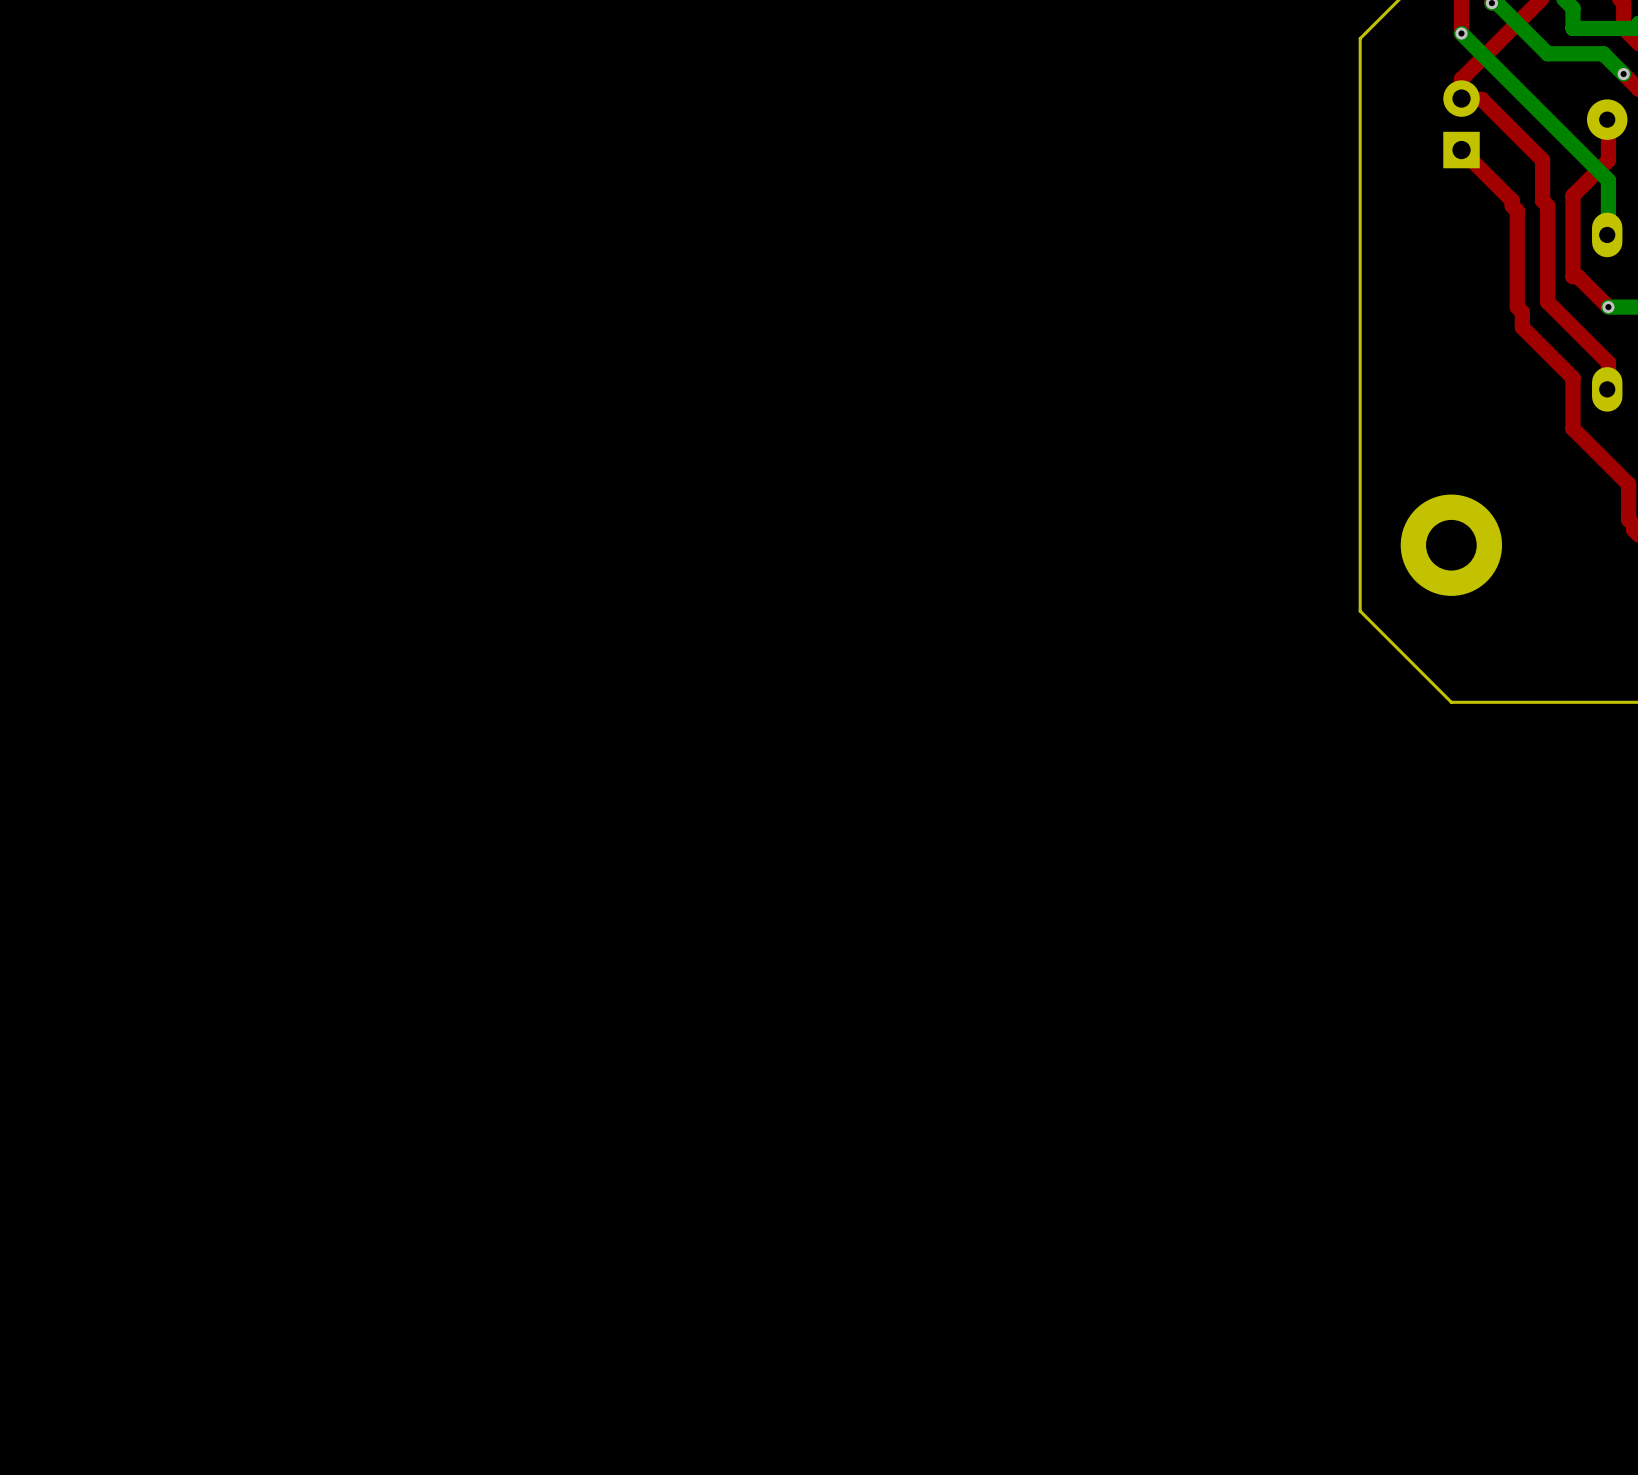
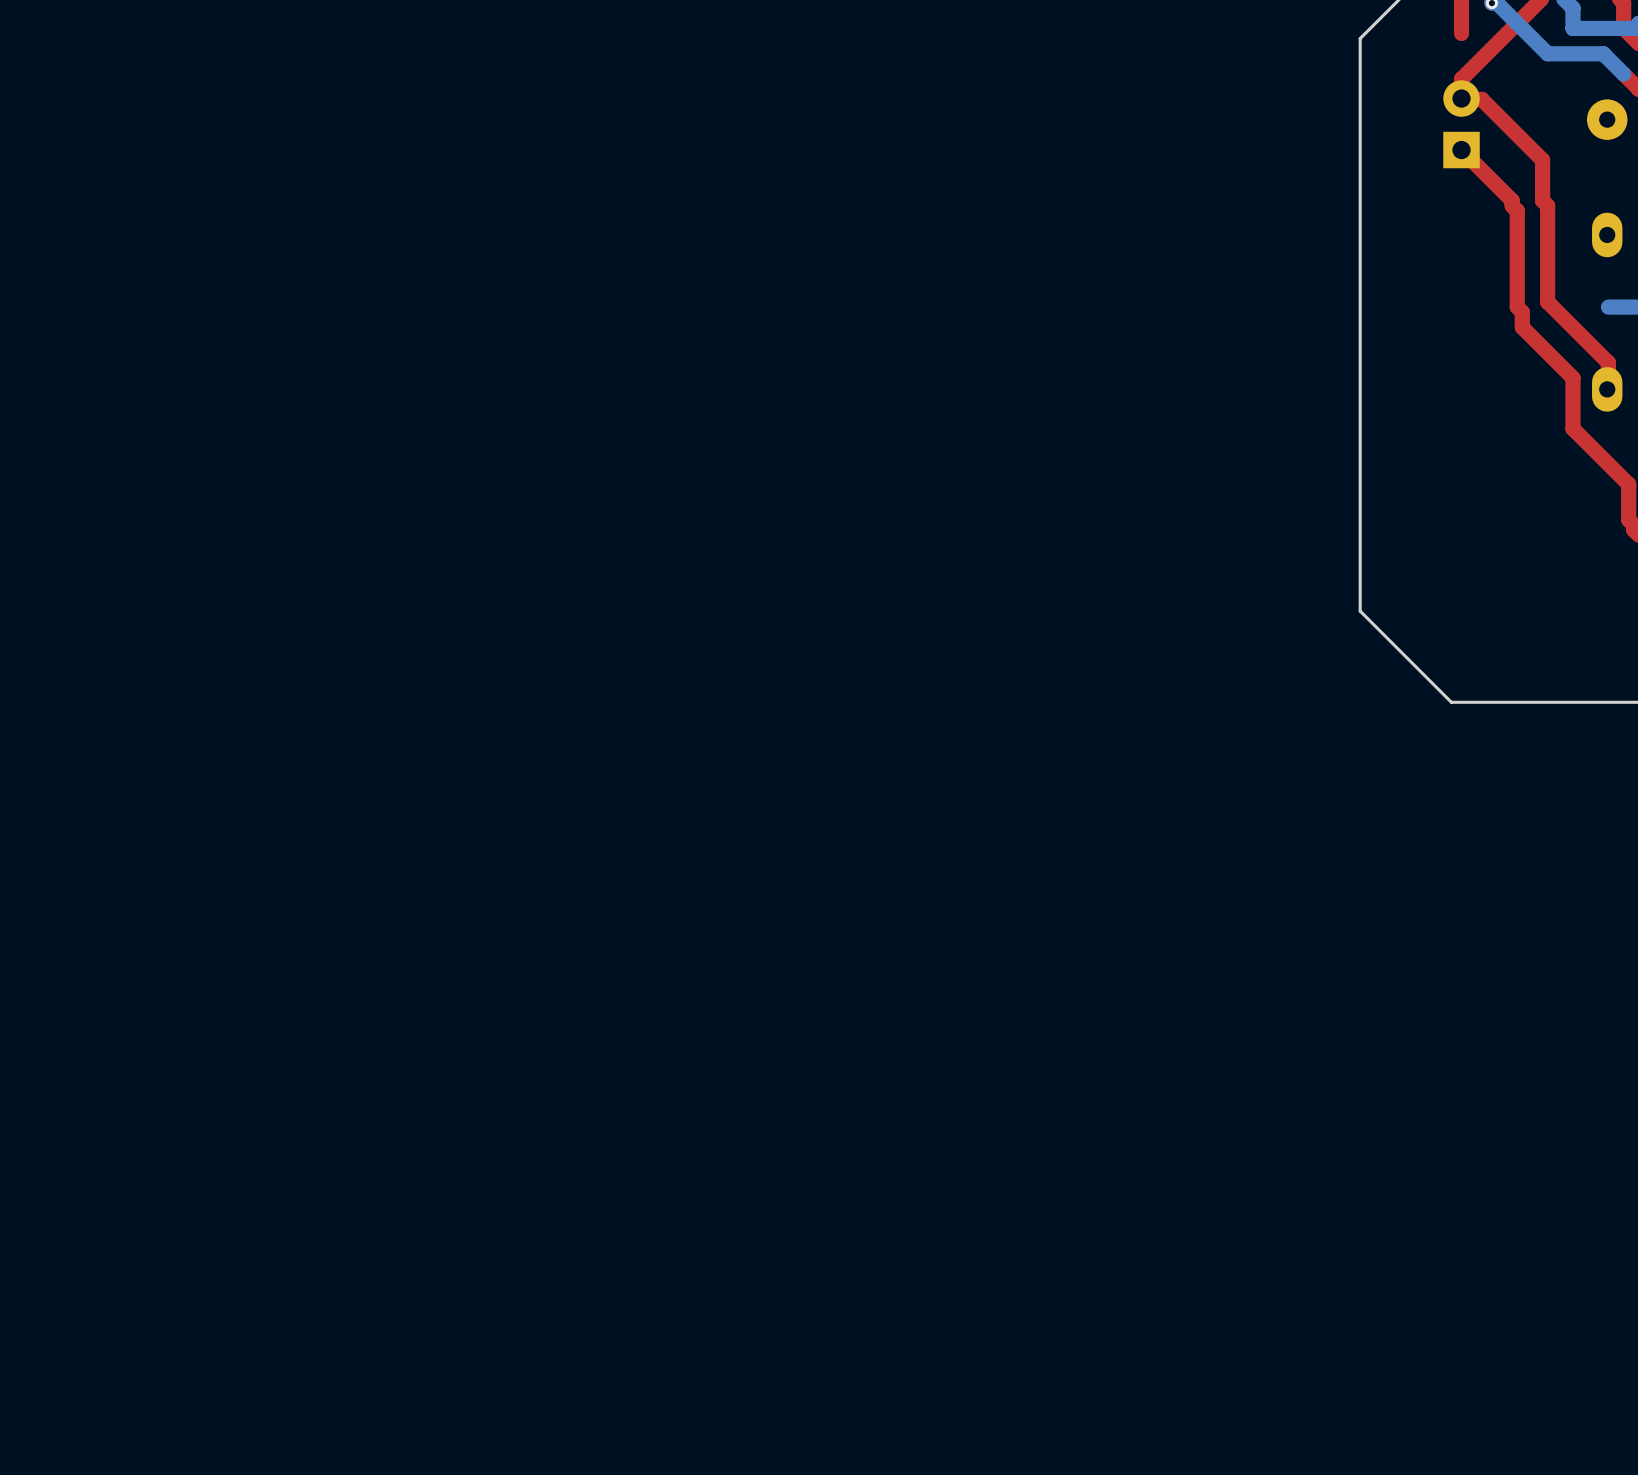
bottom track: (1461, 33) (1608, 180) (1608, 236) (1607, 234) -> none
via: (1461, 33) -> none
via: (1623, 74) -> none
top track: (1607, 119) (1608, 160) (1572, 195) (1572, 276) (1578, 276) (1608, 307) -> none
via: (1608, 307) -> none
part: (1451, 545) -> none

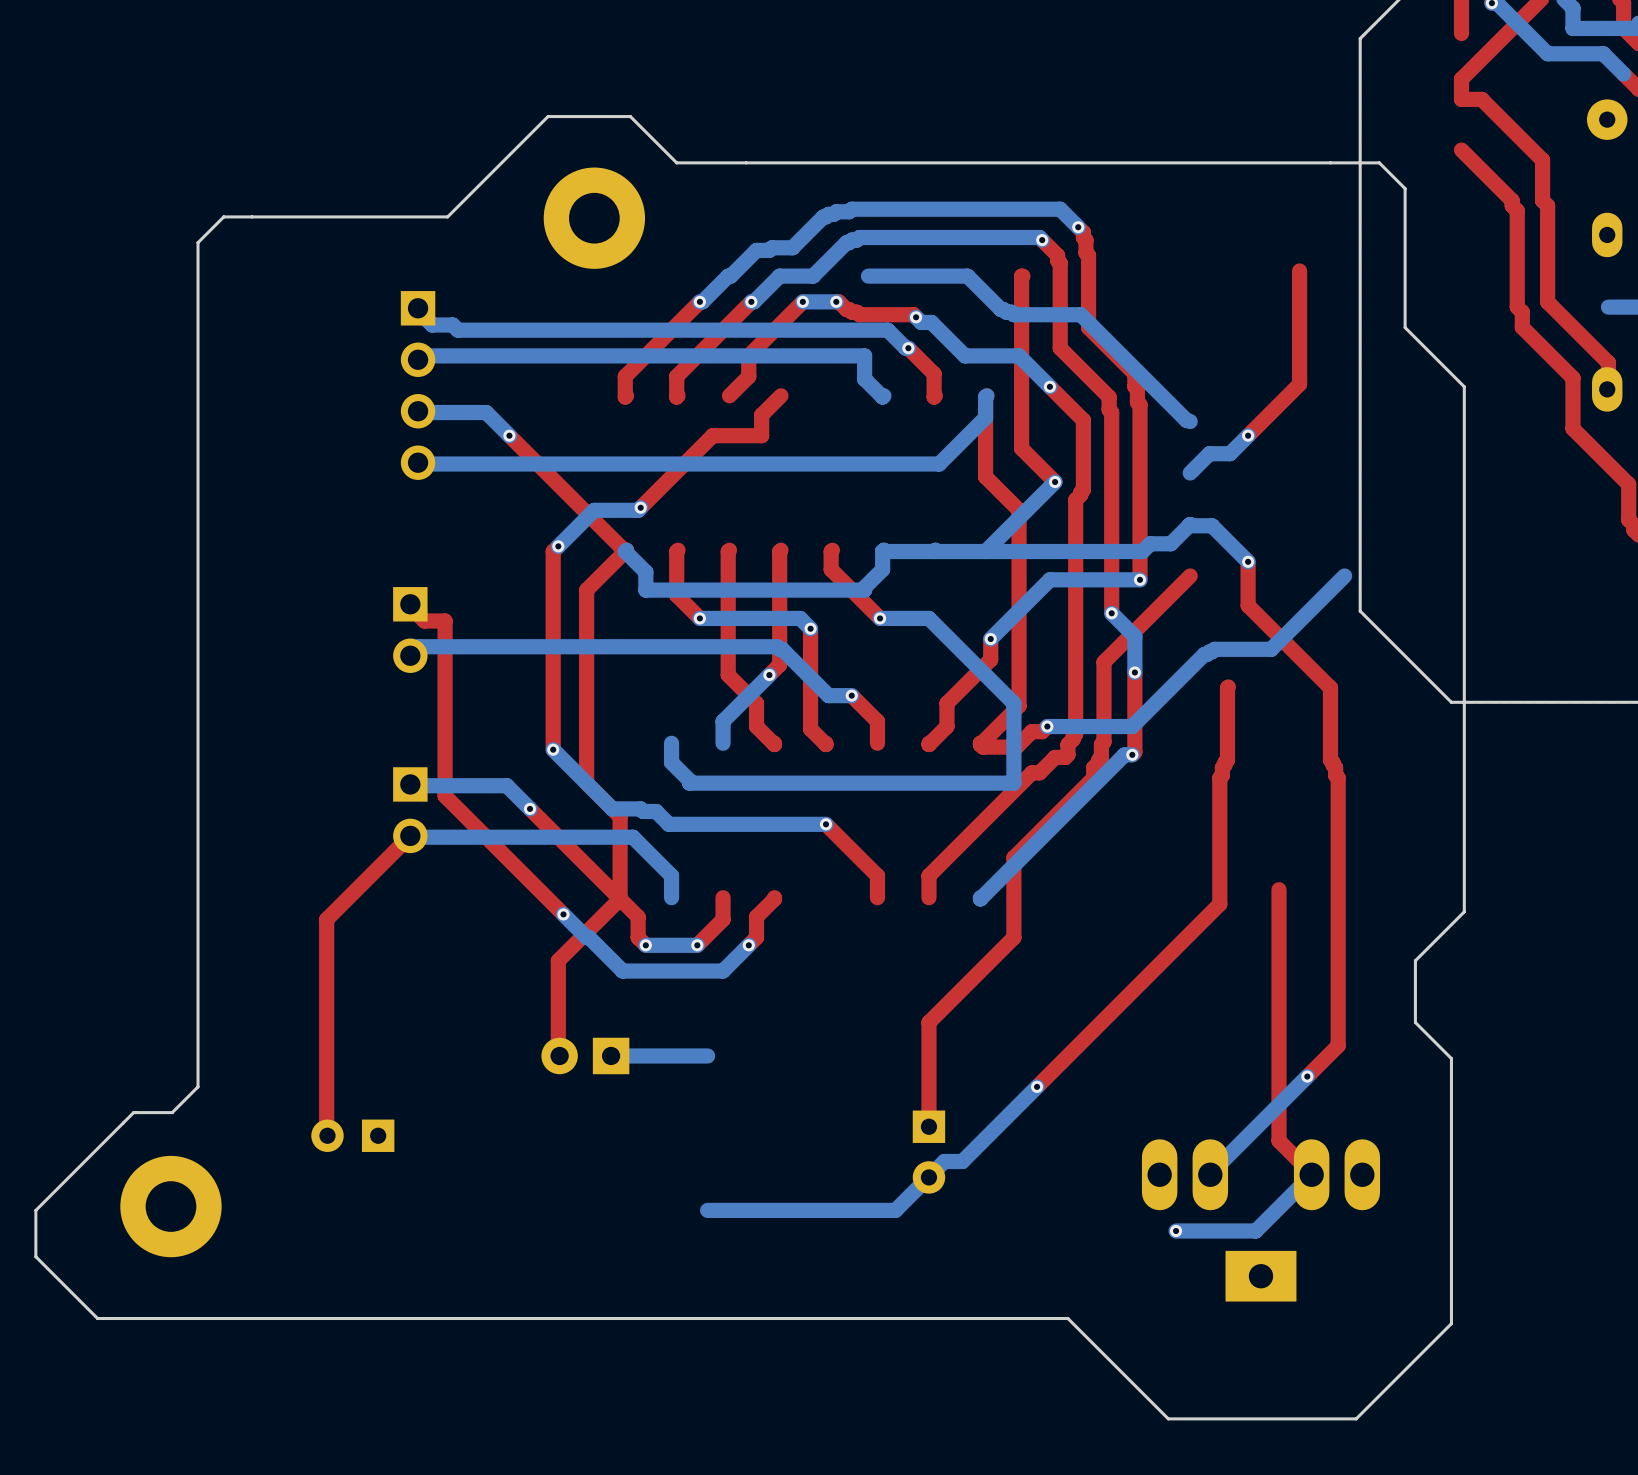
board edge: none -> (630, 116) (548, 116) (447, 216) (223, 216) (198, 242) (198, 1086) (172, 1112) (133, 1112) (35, 1210) (35, 1256) (97, 1318) (1067, 1318) (1168, 1418) (1356, 1418) (1451, 1323) (1451, 1058) (1415, 1022) (1415, 960) (1464, 911) (1464, 386) (1405, 327) (1405, 188) (1379, 162) (676, 162) (630, 116)
part: (1461, 124) -> none
part: none -> (594, 218)
top track: none -> (1078, 227) (1083, 232) (1083, 237) (1085, 240) (1085, 252) (1088, 255) (1088, 327) (1134, 373) (1134, 386) (1137, 389) (1137, 402) (1140, 404) (1140, 579)
bottom track: none -> (1078, 227) (1060, 209) (851, 209) (849, 211) (836, 211) (823, 216) (792, 247) (756, 250) (730, 276) (728, 276) (702, 301) (699, 301)
via: none -> (1078, 227)
top track: none -> (1042, 240) (1057, 255) (1057, 260) (1060, 263) (1060, 348) (1109, 397) (1109, 409) (1111, 412) (1111, 613)
bottom track: none -> (1042, 240) (1039, 237) (859, 237) (846, 242) (813, 276) (779, 276) (753, 301) (751, 301)
via: none -> (1042, 240)
top track: none -> (1299, 270) (1299, 384) (1248, 435)
bottom track: none -> (868, 276) (967, 276) (1001, 309) (1006, 312) (1011, 312) (1013, 314) (1080, 314) (1186, 420) (1190, 421)
top track: none -> (1022, 276) (1021, 448) (1055, 482)
top track: none -> (699, 301) (625, 376) (625, 397) (626, 395)
via: none -> (699, 301)
top track: none -> (751, 301) (676, 376) (676, 397) (678, 395)
via: none -> (751, 301)
top track: none -> (802, 301) (748, 355) (748, 376) (729, 395)
via: none -> (802, 301)
top track: none -> (836, 301) (838, 301) (846, 309) (859, 314) (913, 314) (916, 317)
bottom track: none -> (836, 301) (802, 301)
via: none -> (836, 301)
bottom track: none -> (418, 308) (419, 312) (432, 325) (452, 325) (457, 330) (887, 330) (905, 348) (908, 348)
bottom track: none -> (916, 317) (921, 322) (931, 322) (965, 355) (1019, 355) (1049, 386)
via: none -> (916, 317)
top track: none -> (908, 348) (934, 373) (934, 397) (935, 395)
via: none -> (908, 348)
bottom track: none -> (418, 359) (421, 355) (864, 355) (864, 379) (882, 397) (883, 395)
part: none -> (418, 385)
top track: none -> (1049, 386) (1083, 420) (1083, 489) (1075, 500) (1075, 734) (1067, 744) (1067, 754) (1065, 757) (1055, 757) (1039, 772) (1031, 772) (928, 875) (928, 897)
via: none -> (1049, 386)
top track: none -> (780, 395) (761, 415) (761, 435) (712, 435) (640, 507)
top track: none -> (986, 395) (985, 476) (1019, 510) (1019, 705) (980, 744)
bottom track: none -> (986, 395) (985, 417) (939, 464) (416, 464) (418, 462)
bottom track: none -> (418, 411) (416, 412) (486, 412) (509, 435)
top track: none -> (509, 435) (622, 548) (626, 550) (586, 590) (586, 783) (620, 816) (620, 898) (558, 960) (559, 1055)
via: none -> (509, 435)
bottom track: none -> (1248, 435) (1230, 453) (1209, 453) (1190, 473)
via: none -> (1248, 435)
bottom track: none -> (1055, 482) (985, 551)
via: none -> (1055, 482)
bottom track: none -> (640, 507) (638, 510) (594, 510) (558, 546)
via: none -> (640, 507)
bottom track: none -> (1190, 524) (1170, 543) (1150, 543) (1142, 551) (882, 551)
bottom track: none -> (1188, 525) (1212, 525) (1248, 561)
top track: none -> (558, 546) (553, 551) (553, 749)
via: none -> (558, 546)
bottom track: none -> (626, 550) (625, 551) (645, 572) (645, 590) (864, 590) (864, 587) (882, 569) (882, 551)
top track: none -> (678, 550) (676, 595) (699, 618)
top track: none -> (729, 550) (728, 675) (756, 703) (756, 726) (774, 743)
top track: none -> (780, 550) (779, 664) (769, 675)
top track: none -> (832, 550) (831, 569) (880, 618)
top track: none -> (1248, 561) (1248, 605) (1330, 687)
via: none -> (1248, 561)
top track: none -> (1190, 575) (1103, 662) (1103, 741) (1101, 744) (1101, 757) (1093, 767) (1093, 778) (1013, 857) (1013, 937) (928, 1022) (928, 1126)
bottom track: none -> (1344, 575) (1271, 649) (1214, 649) (1204, 654) (1132, 726) (1047, 726)
bottom track: none -> (1140, 579) (1049, 579) (990, 639)
via: none -> (1140, 579)
top track: none -> (410, 604) (409, 605) (424, 621) (445, 621) (445, 796) (563, 914)
bottom track: none -> (1111, 613) (1134, 636) (1134, 672)
via: none -> (1111, 613)
bottom track: none -> (699, 618) (800, 618) (810, 628)
via: none -> (699, 618)
bottom track: none -> (880, 618) (928, 618) (1013, 703) (1013, 783) (689, 783) (689, 780) (671, 762) (671, 743)
via: none -> (880, 618)
top track: none -> (810, 628) (810, 729) (826, 743)
via: none -> (810, 628)
part: none -> (410, 630)
top track: none -> (990, 639) (990, 659) (946, 703) (946, 726) (928, 743)
via: none -> (990, 639)
bottom track: none -> (410, 655) (419, 646) (777, 646) (782, 649) (828, 695) (851, 695)
top track: none -> (1134, 672) (1134, 752) (1132, 754)
via: none -> (1134, 672)
bottom track: none -> (769, 675) (723, 721) (723, 743)
via: none -> (769, 675)
top track: none -> (1228, 686) (1227, 759) (1222, 767) (1222, 775) (1219, 778) (1219, 904) (1037, 1086)
top track: none -> (1330, 687) (1330, 759) (1335, 767) (1335, 775) (1338, 778) (1338, 1045) (1307, 1076)
top track: none -> (851, 695) (877, 721) (877, 743)
via: none -> (851, 695)
top track: none -> (1047, 726) (1042, 731) (1031, 731) (1016, 747) (983, 747) (980, 744)
via: none -> (1047, 726)
bottom track: none -> (553, 749) (612, 808) (640, 808) (643, 811) (656, 811) (669, 824) (826, 824)
via: none -> (553, 749)
bottom track: none -> (1132, 754) (1124, 754) (980, 897)
via: none -> (1132, 754)
bottom track: none -> (410, 784) (409, 785) (506, 785) (530, 808)
top track: none -> (530, 808) (638, 916) (638, 937) (645, 945)
via: none -> (530, 808)
part: none -> (410, 810)
top track: none -> (826, 824) (877, 875) (877, 897)
via: none -> (826, 824)
top track: none -> (410, 835) (326, 919) (326, 1130)
bottom track: none -> (410, 835) (409, 837) (632, 837) (671, 875) (671, 897)
top track: none -> (1279, 889) (1279, 1140) (1311, 1174)
top track: none -> (723, 897) (723, 919) (697, 945)
top track: none -> (774, 897) (756, 916) (756, 937) (748, 945)
bottom track: none -> (563, 914) (622, 971) (723, 971) (748, 945)
via: none -> (563, 914)
via: none -> (645, 945)
bottom track: none -> (697, 945) (645, 945)
via: none -> (697, 945)
via: none -> (748, 945)
part: none -> (585, 1055)
bottom track: none -> (707, 1055) (611, 1055)
bottom track: none -> (1307, 1076) (1210, 1174)
via: none -> (1307, 1076)
bottom track: none -> (1037, 1086) (962, 1161) (944, 1161) (895, 1210) (707, 1210)
via: none -> (1037, 1086)
part: none -> (352, 1135)
part: none -> (928, 1152)
bottom track: none -> (1311, 1174) (1255, 1231) (1176, 1231)
part: none -> (170, 1206)
part: none -> (1260, 1220)
via: none -> (1176, 1231)

